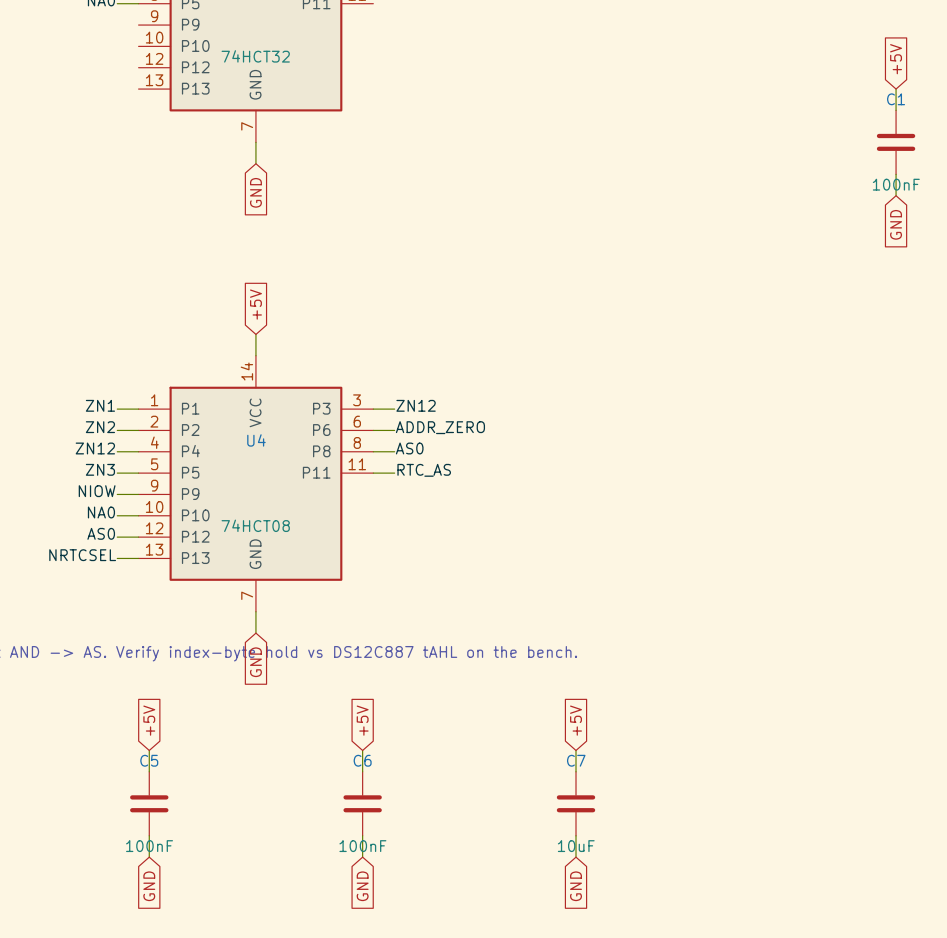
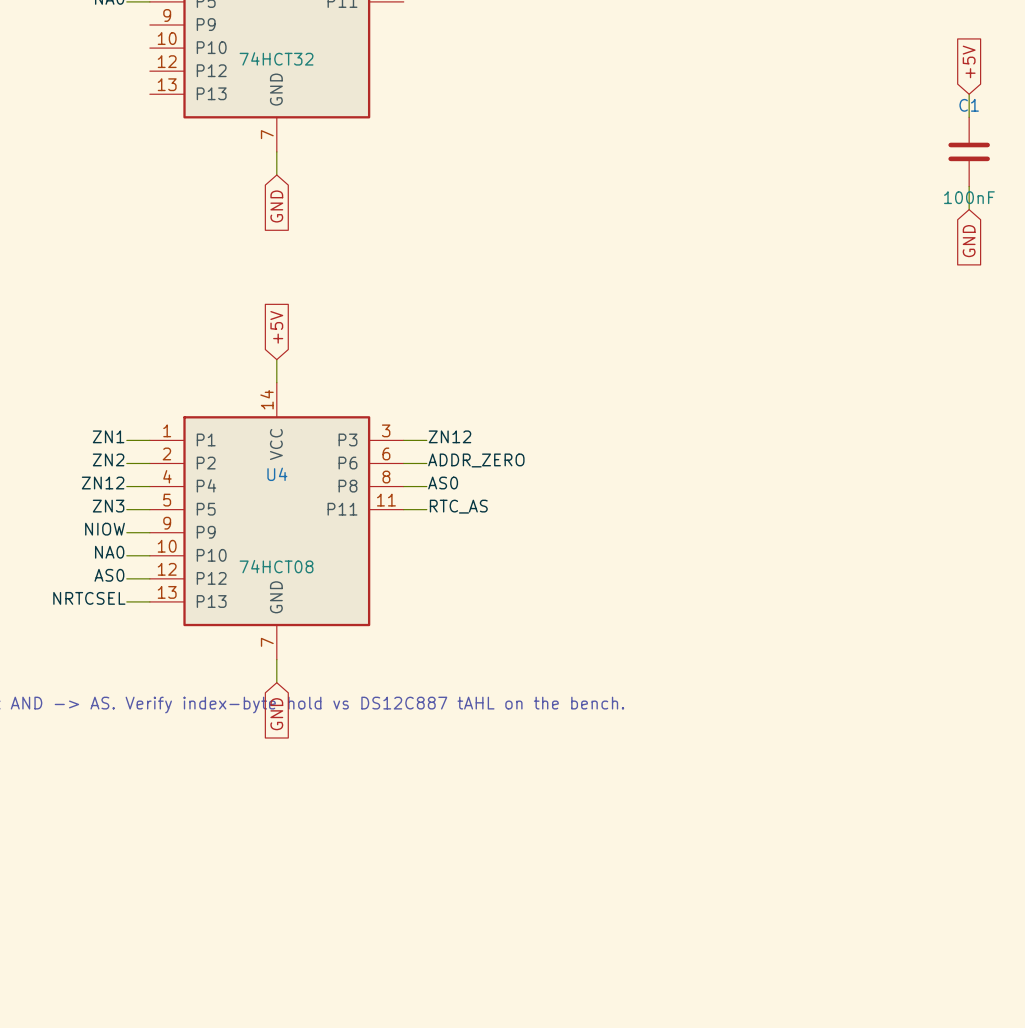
global label: +5V (149, 720) -> none
global label: +5V (362, 720) -> none
global label: +5V (576, 720) -> none
wire: (149, 750) (149, 771) -> none
wire: (362, 750) (362, 771) -> none
wire: (576, 750) (576, 771) -> none
C5: 100nF (149, 803) -> none
C6: 100nF (362, 803) -> none
C7: 10uF (576, 803) -> none
wire: (149, 835) (149, 857) -> none
wire: (362, 835) (362, 857) -> none
wire: (576, 835) (576, 857) -> none
global label: GND (149, 886) -> none
global label: GND (362, 886) -> none
global label: GND (576, 886) -> none

